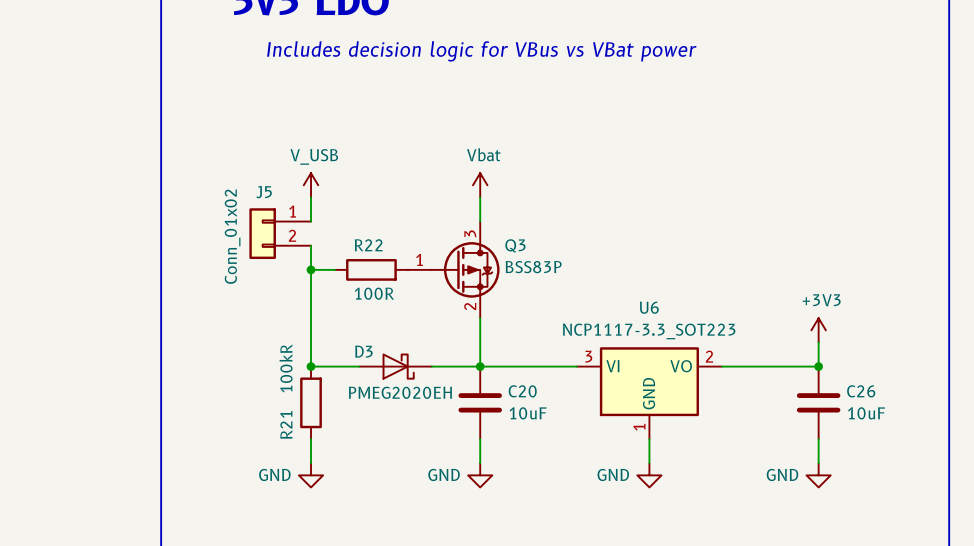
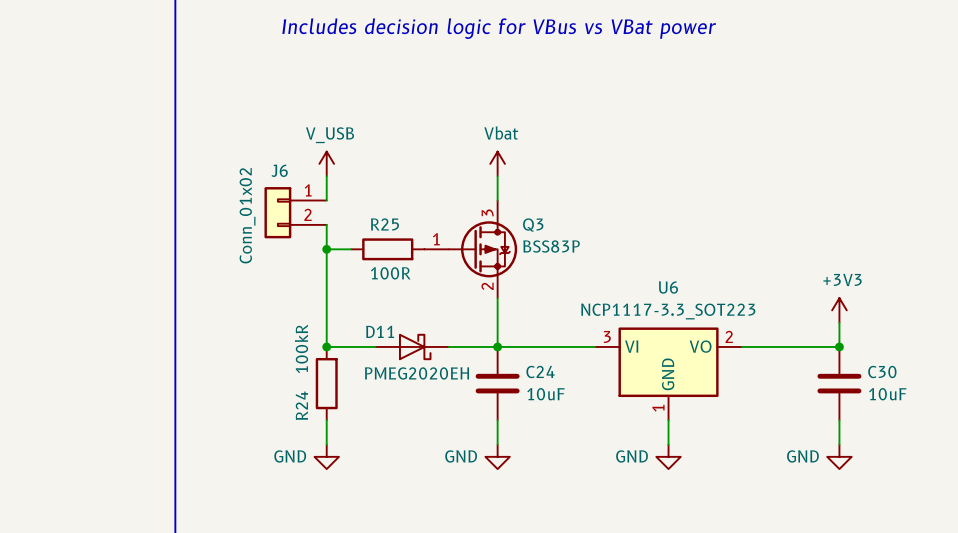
J5 name: J5 (264, 192) -> J6 (279, 170)
R22 name: R22 (368, 245) -> R25 (384, 224)
D3 name: D3 (363, 351) -> D11 (380, 331)
C20 name: C20 (522, 391) -> C24 (540, 371)
C26 name: C26 (861, 391) -> C30 (882, 372)
R21 name: R21 (286, 424) -> R24 (301, 405)

